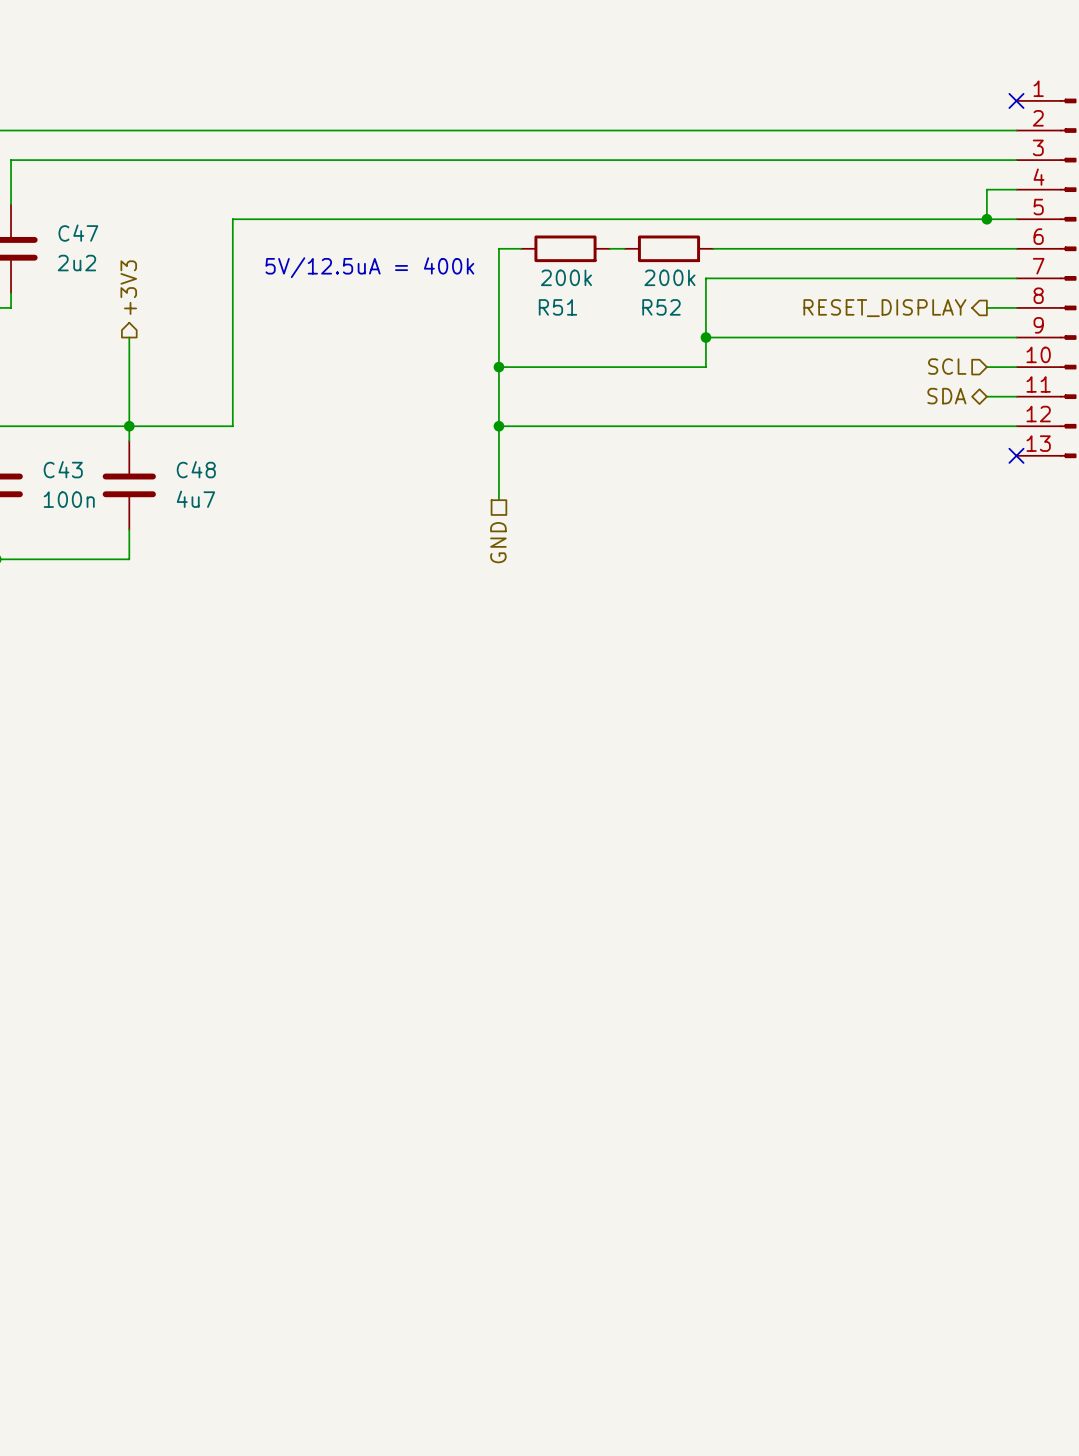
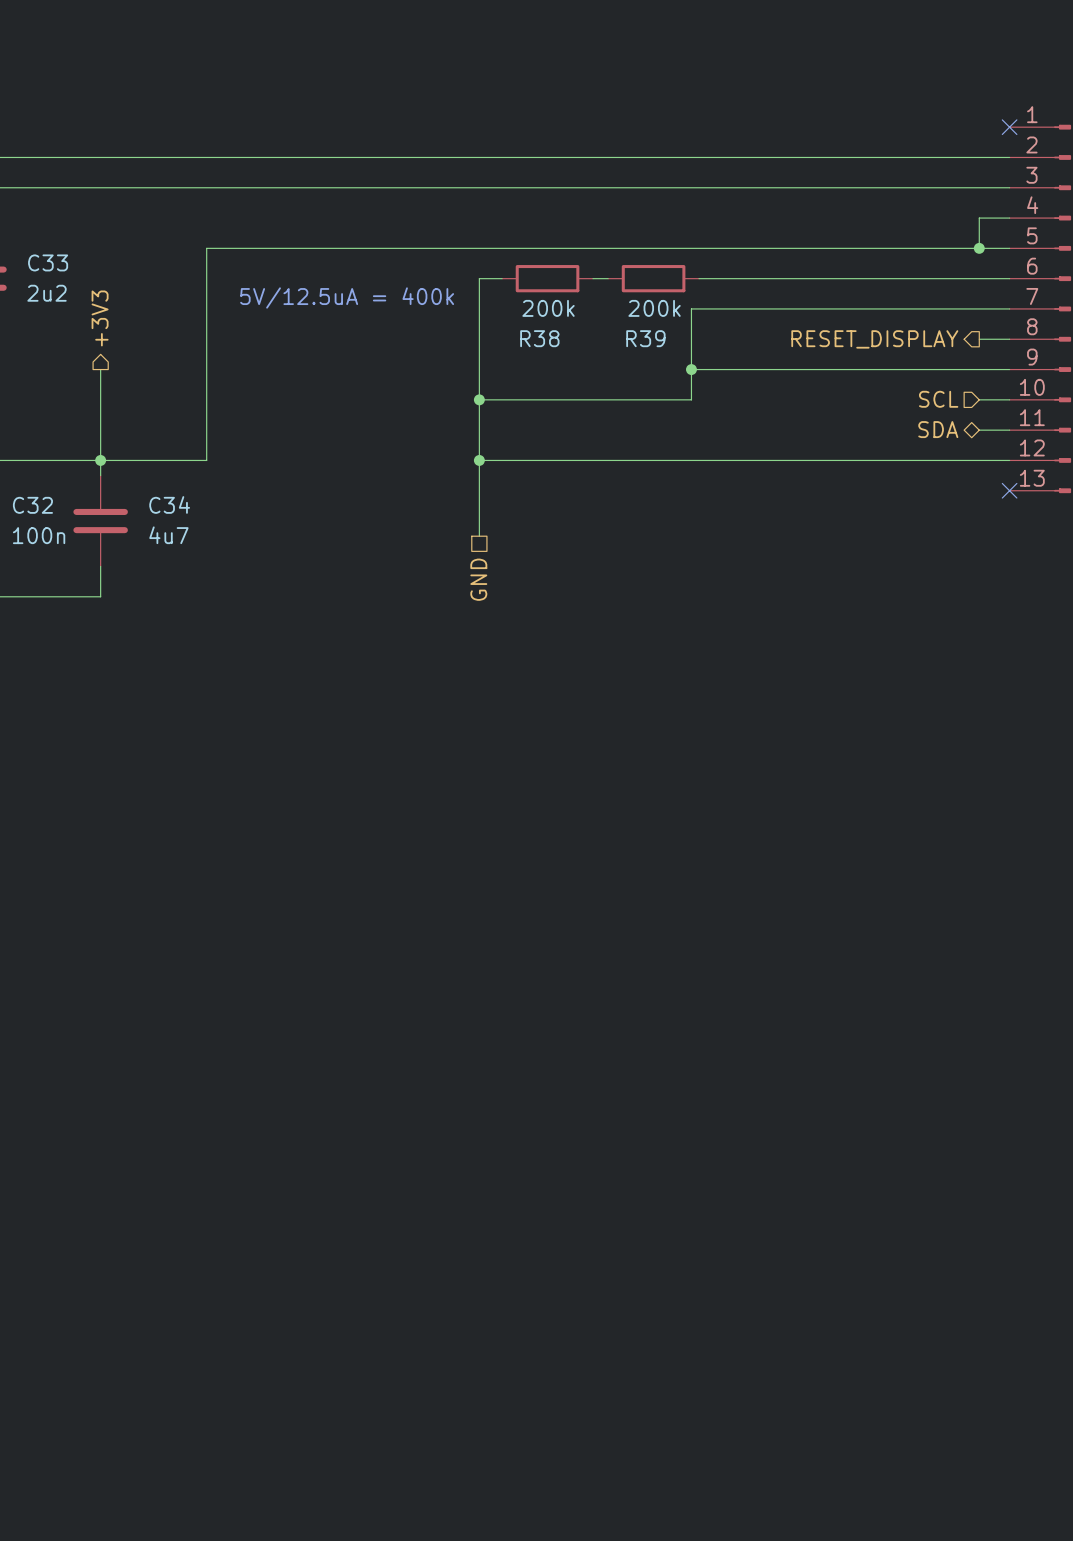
C47 name: C47 (78, 233) -> C33 (48, 262)
R51 name: R51 (557, 307) -> R38 (539, 338)
R52 name: R52 (661, 307) -> R39 (645, 338)
C43 name: C43 (63, 469) -> C32 (32, 505)
C48 name: C48 (196, 469) -> C34 (169, 504)

